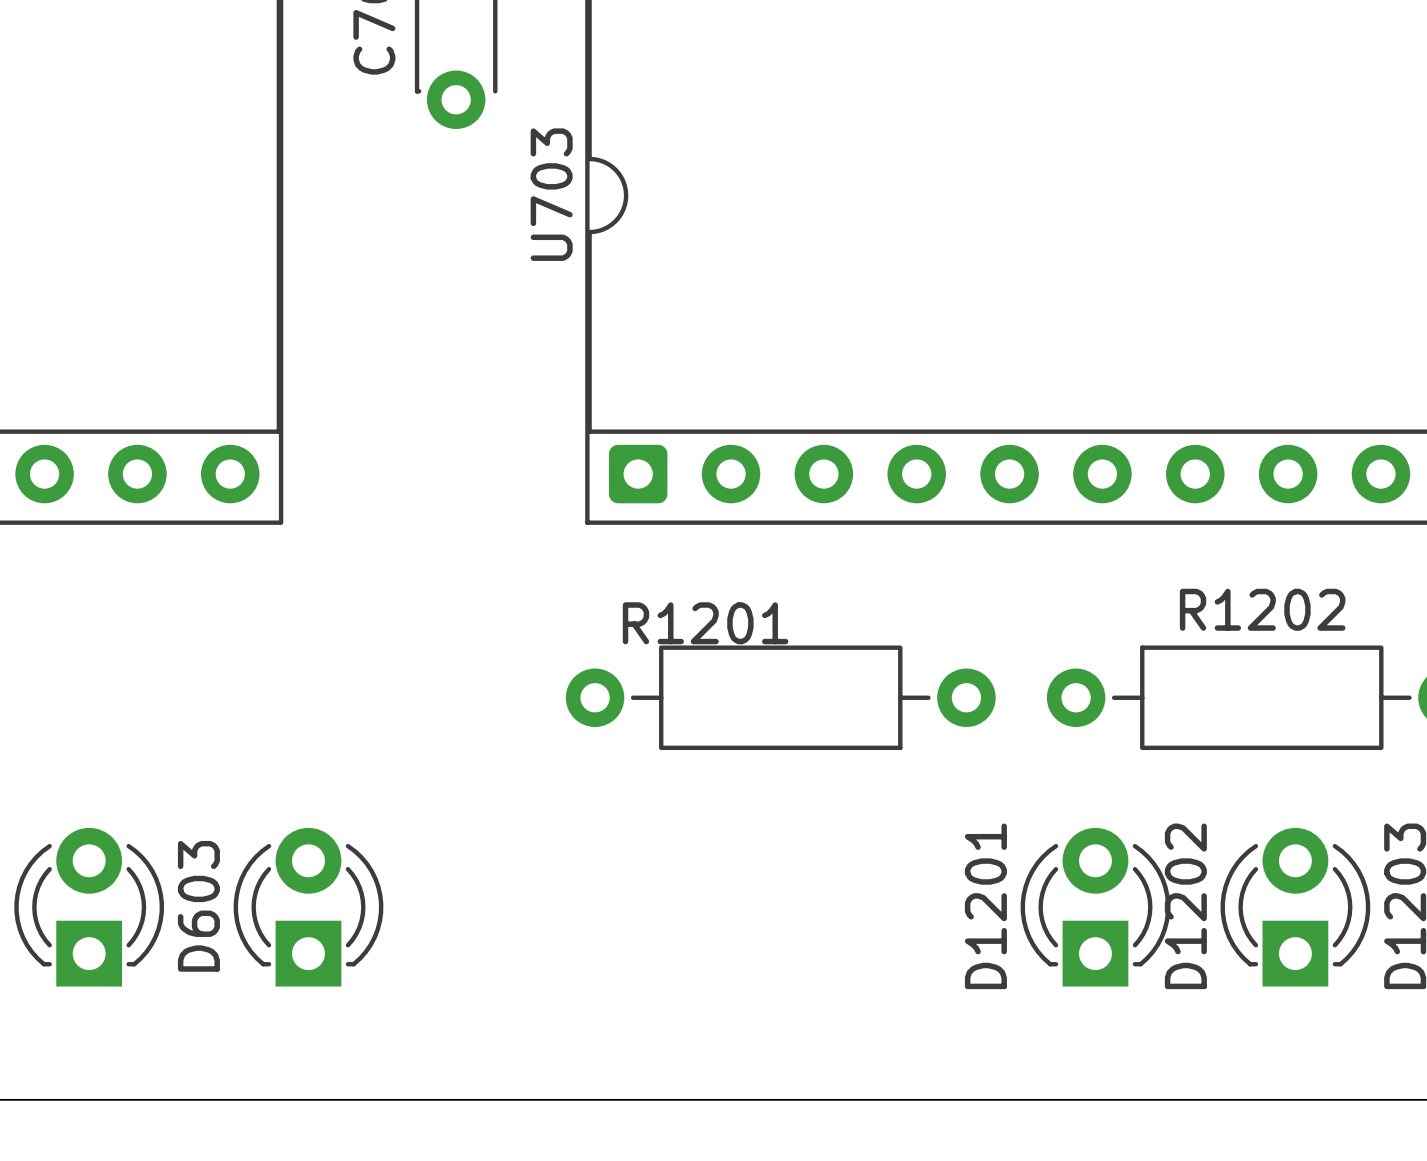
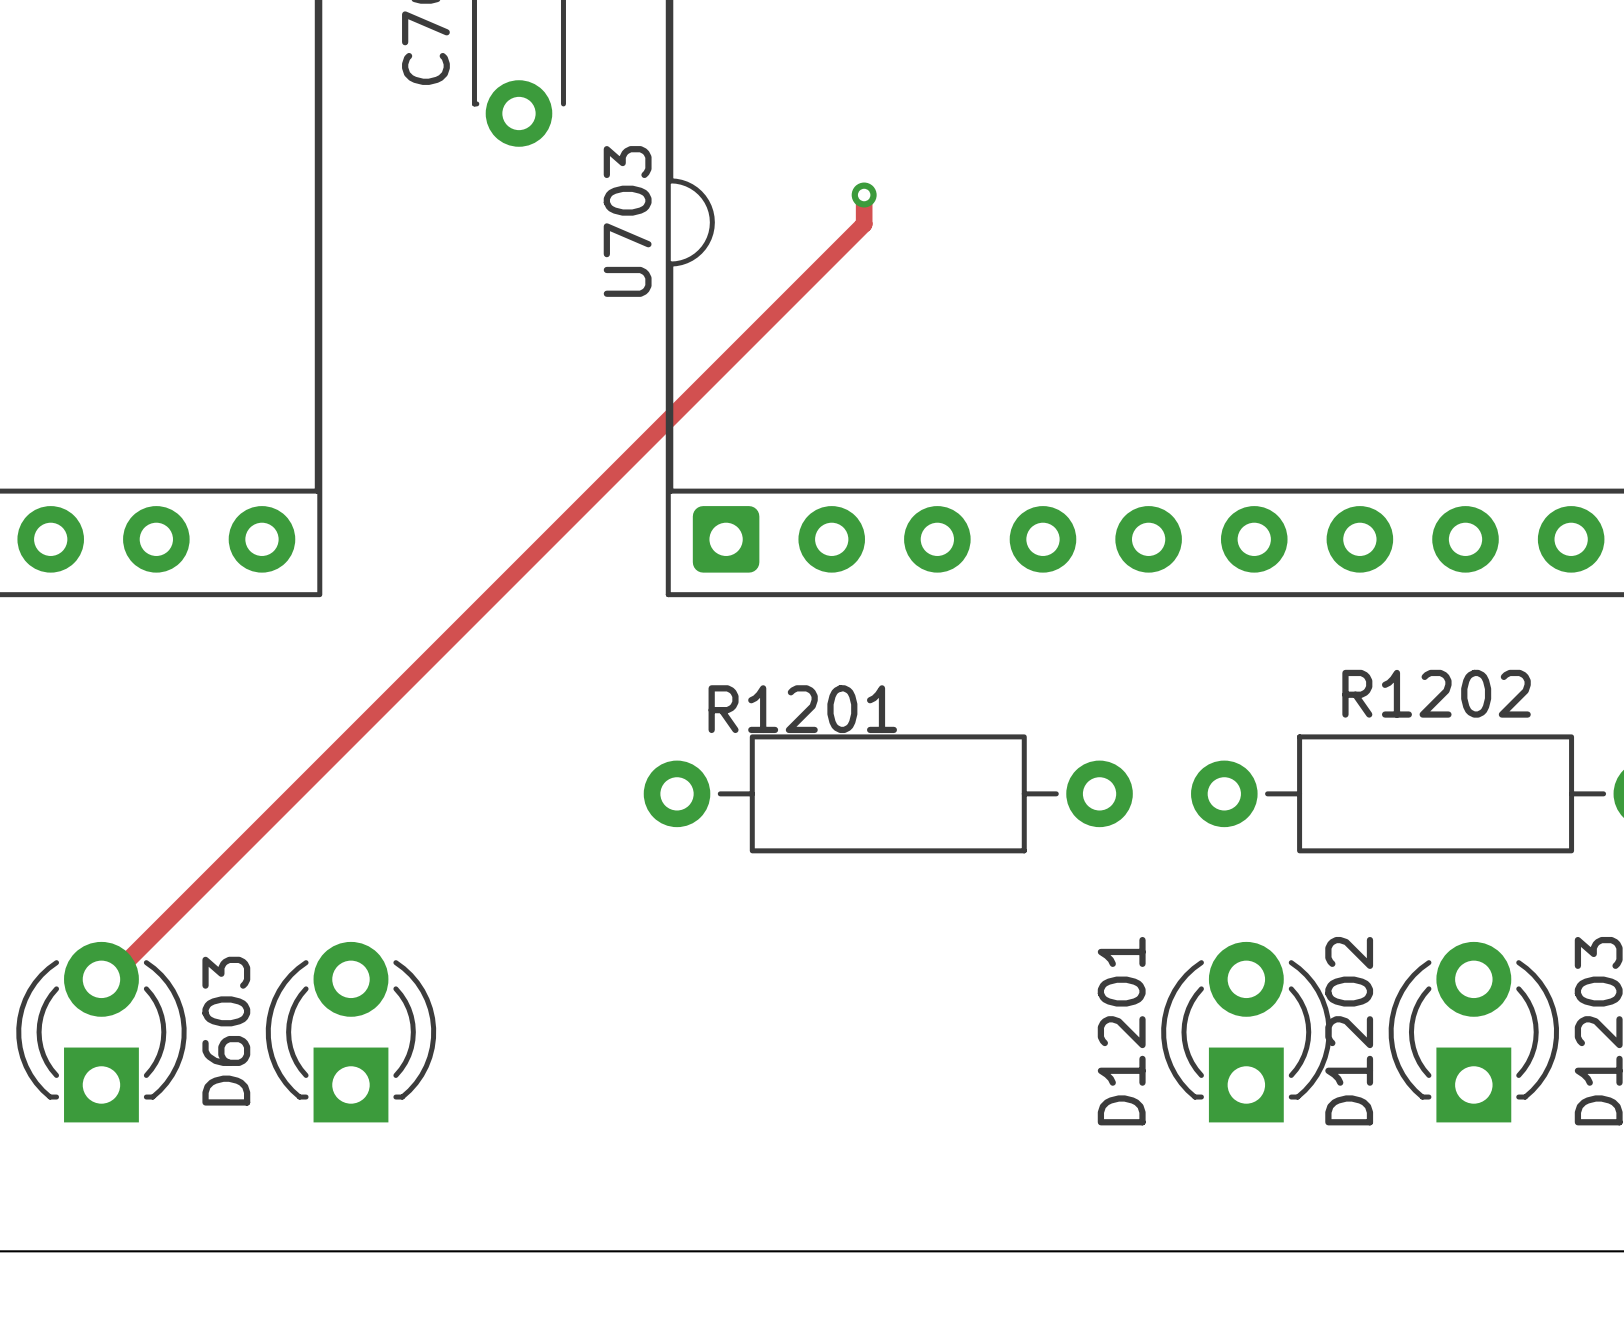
track: none -> (864, 195) (864, 224) (119, 968)
via: none -> (864, 195)

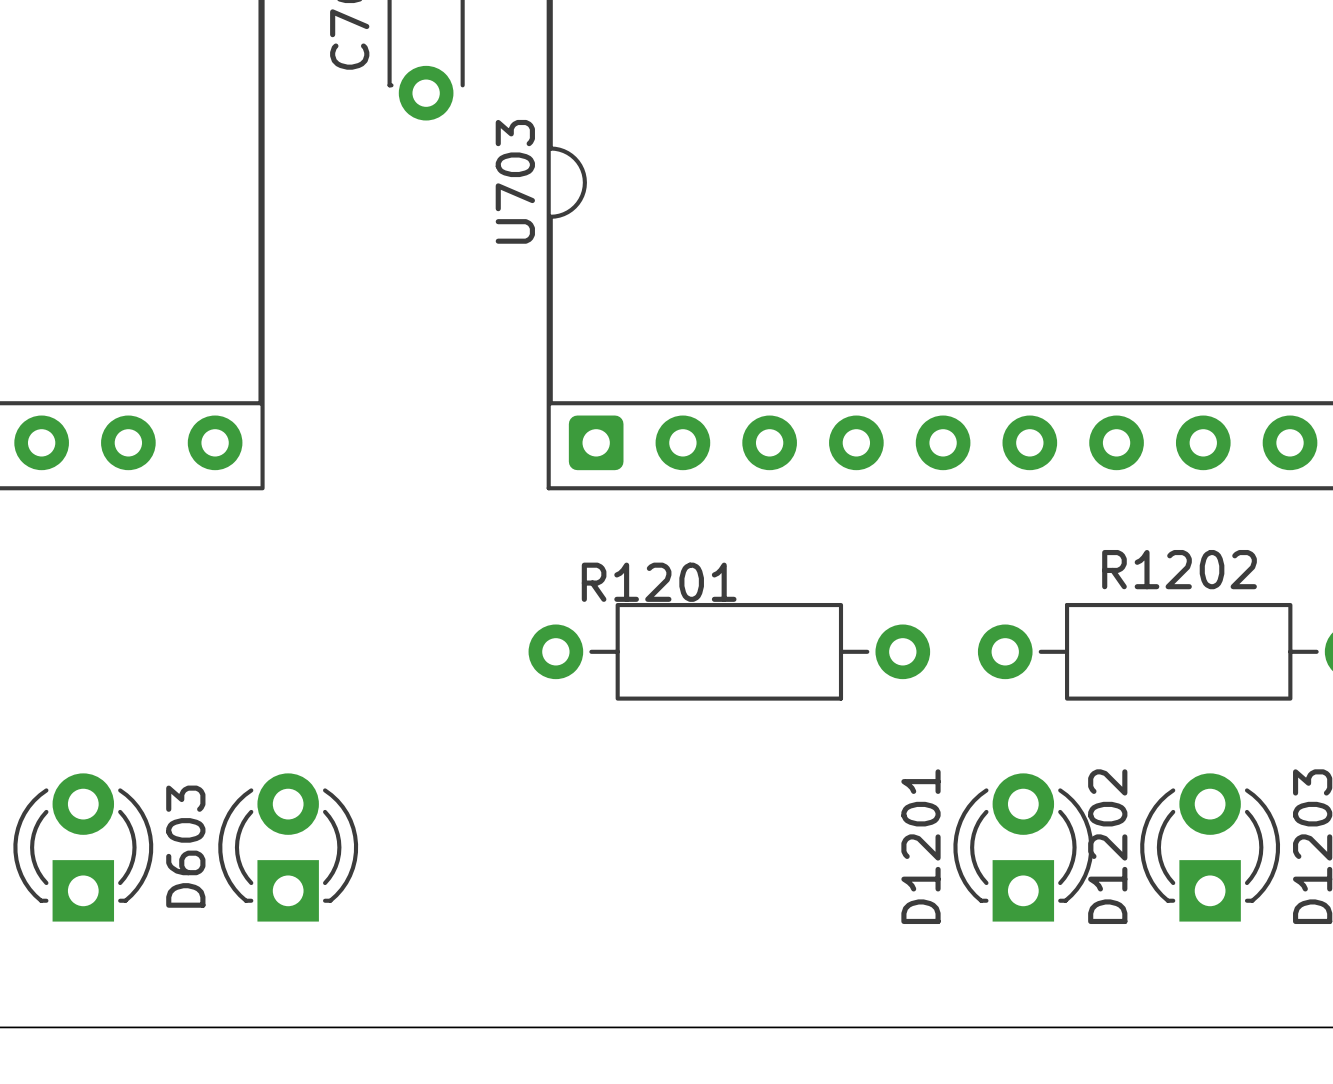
track: (864, 195) (864, 224) (119, 968) -> none
via: (864, 195) -> none

